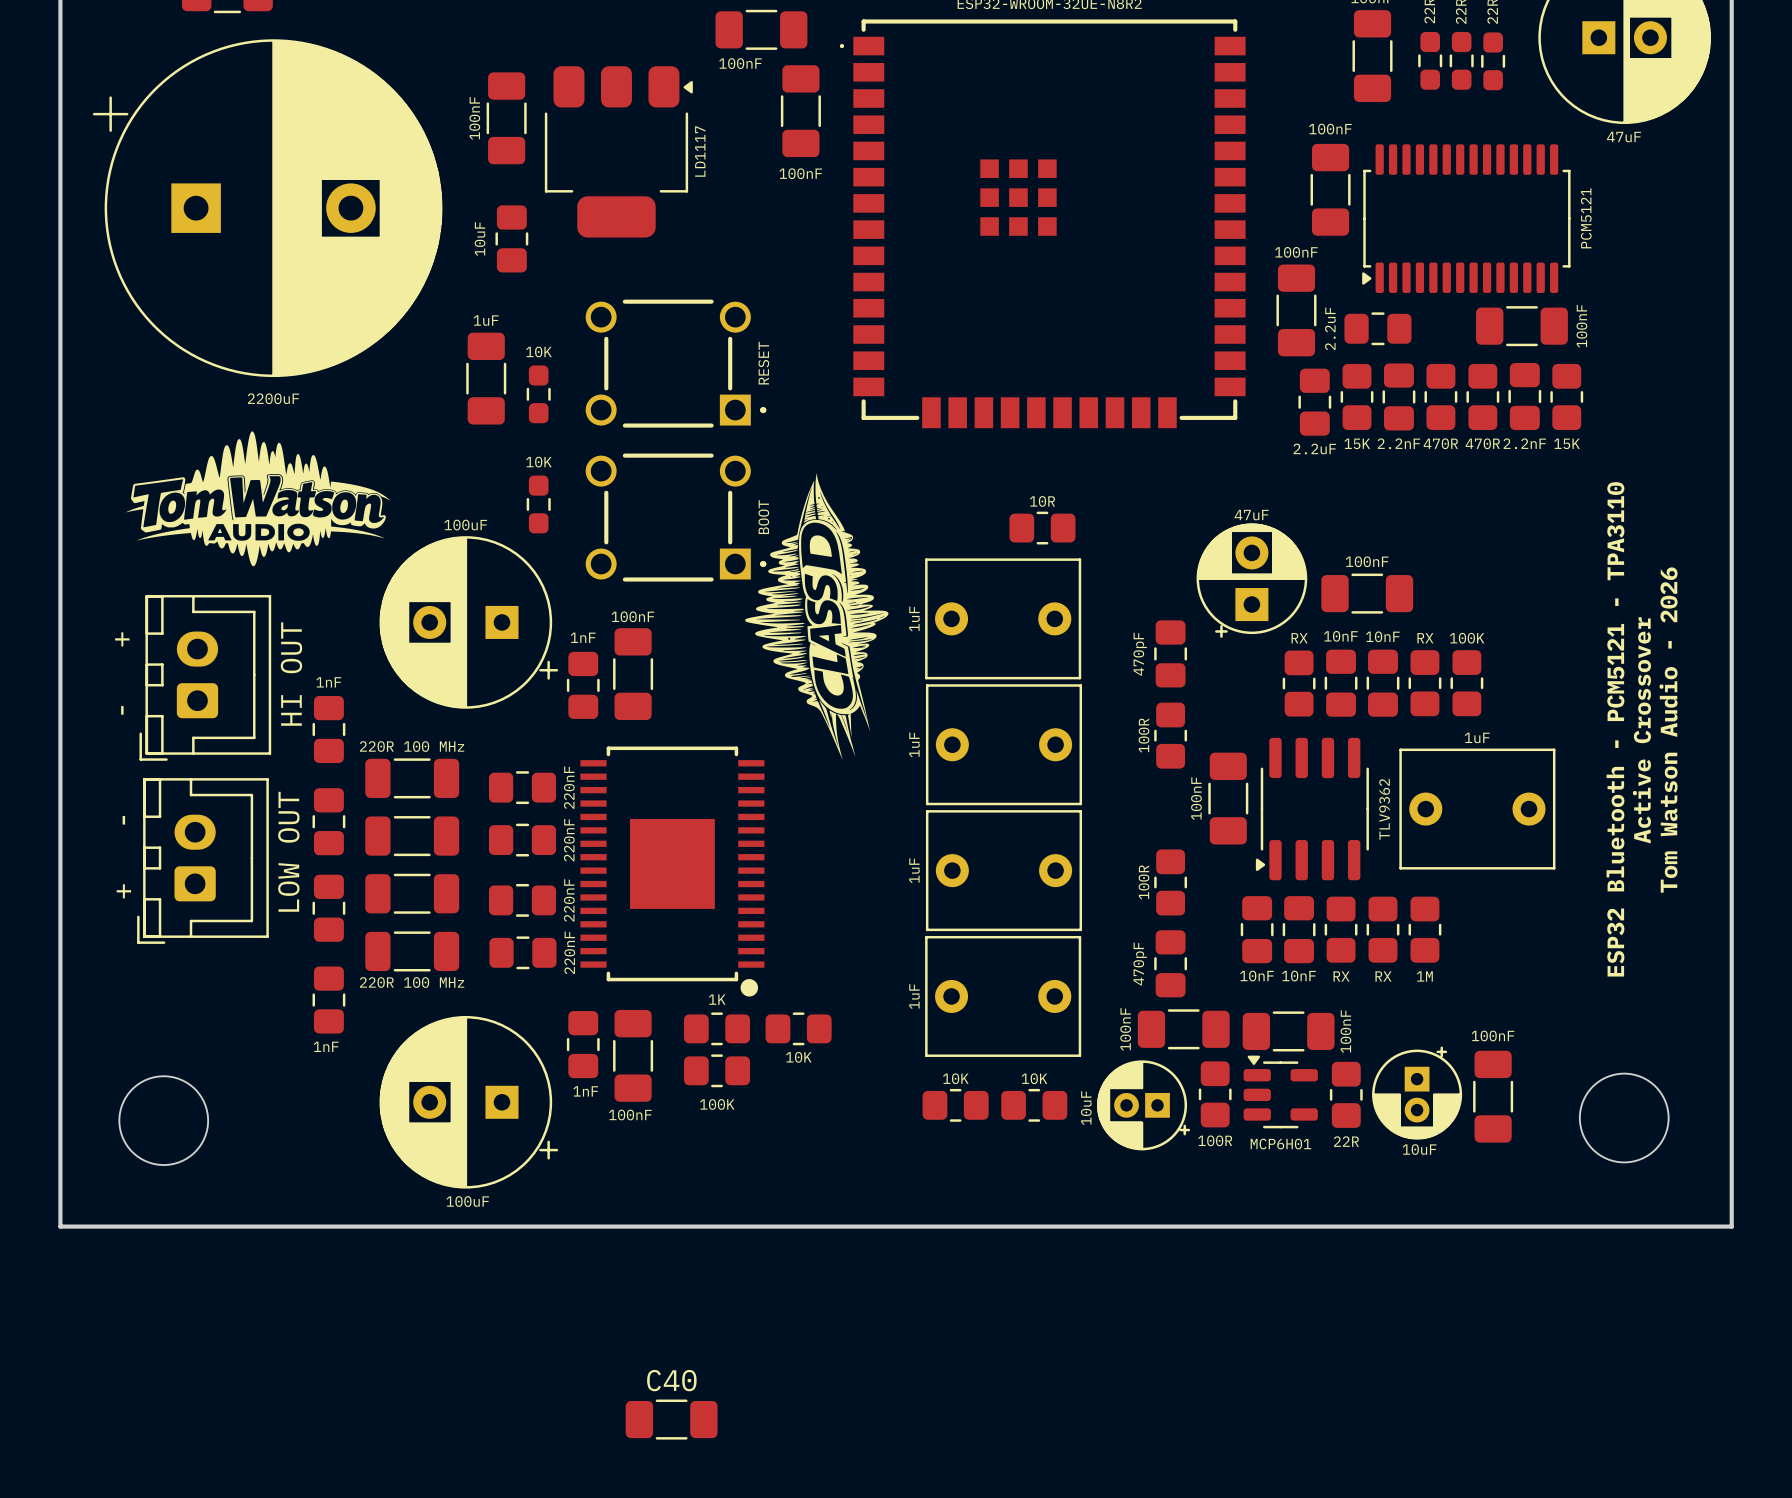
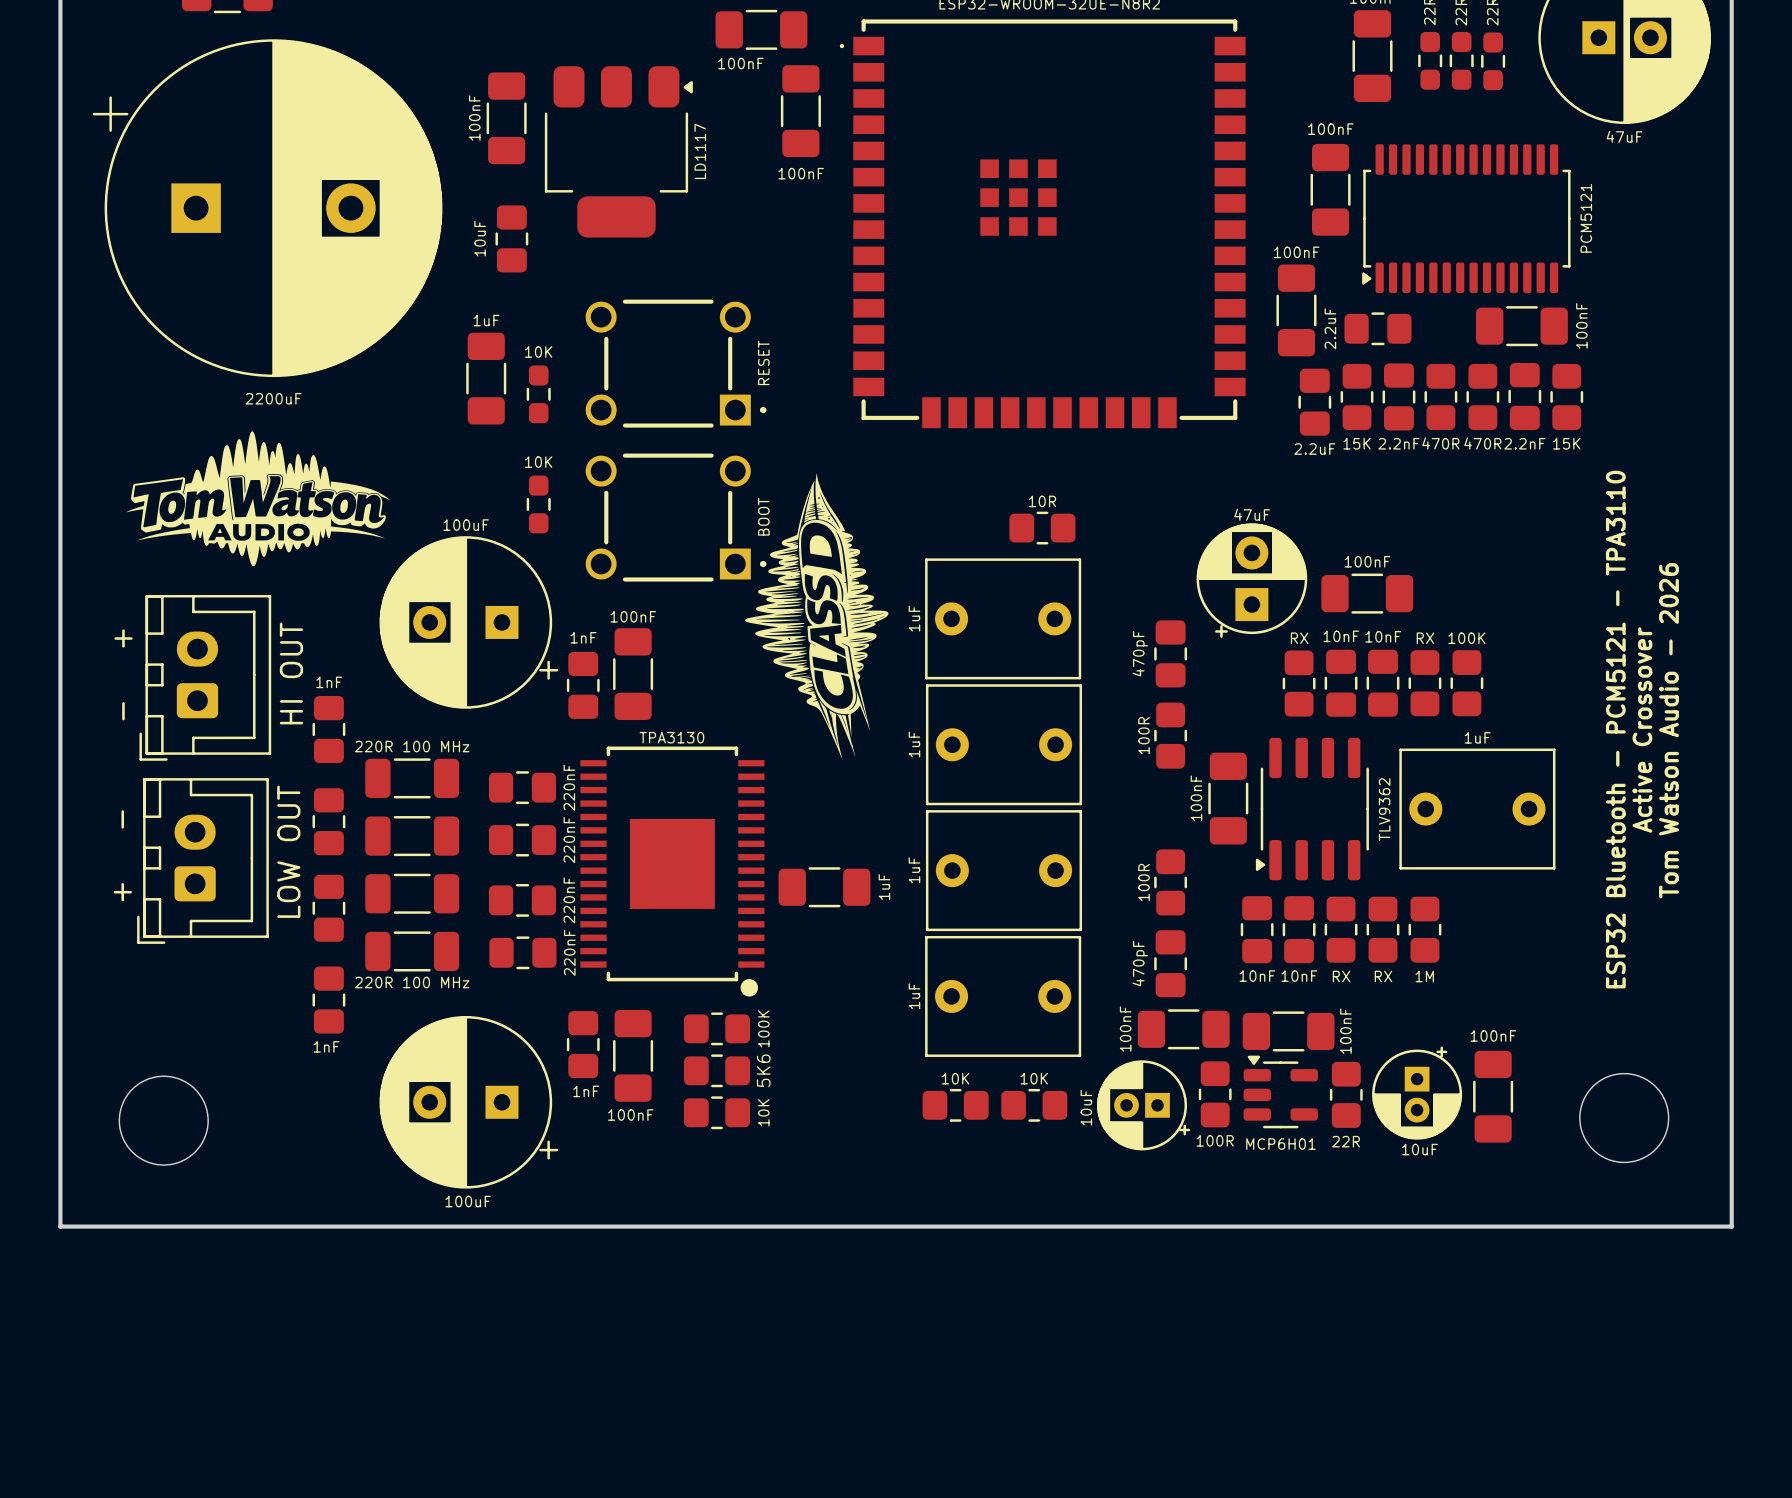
part value: none -> TPA3130 (671, 737)
part: none -> 1uF (824, 887)
part value: 1K (717, 999) -> 100K (763, 1028)
part position: (798, 1028) -> (717, 1112)
part value rotation: 0° (798, 1057) -> 90° counterclockwise (763, 1112)
part value position: 10K (798, 1057) -> 10K (763, 1112)
part value: 100K (717, 1104) -> 5K6 (763, 1070)
C40: (671, 1419) -> none

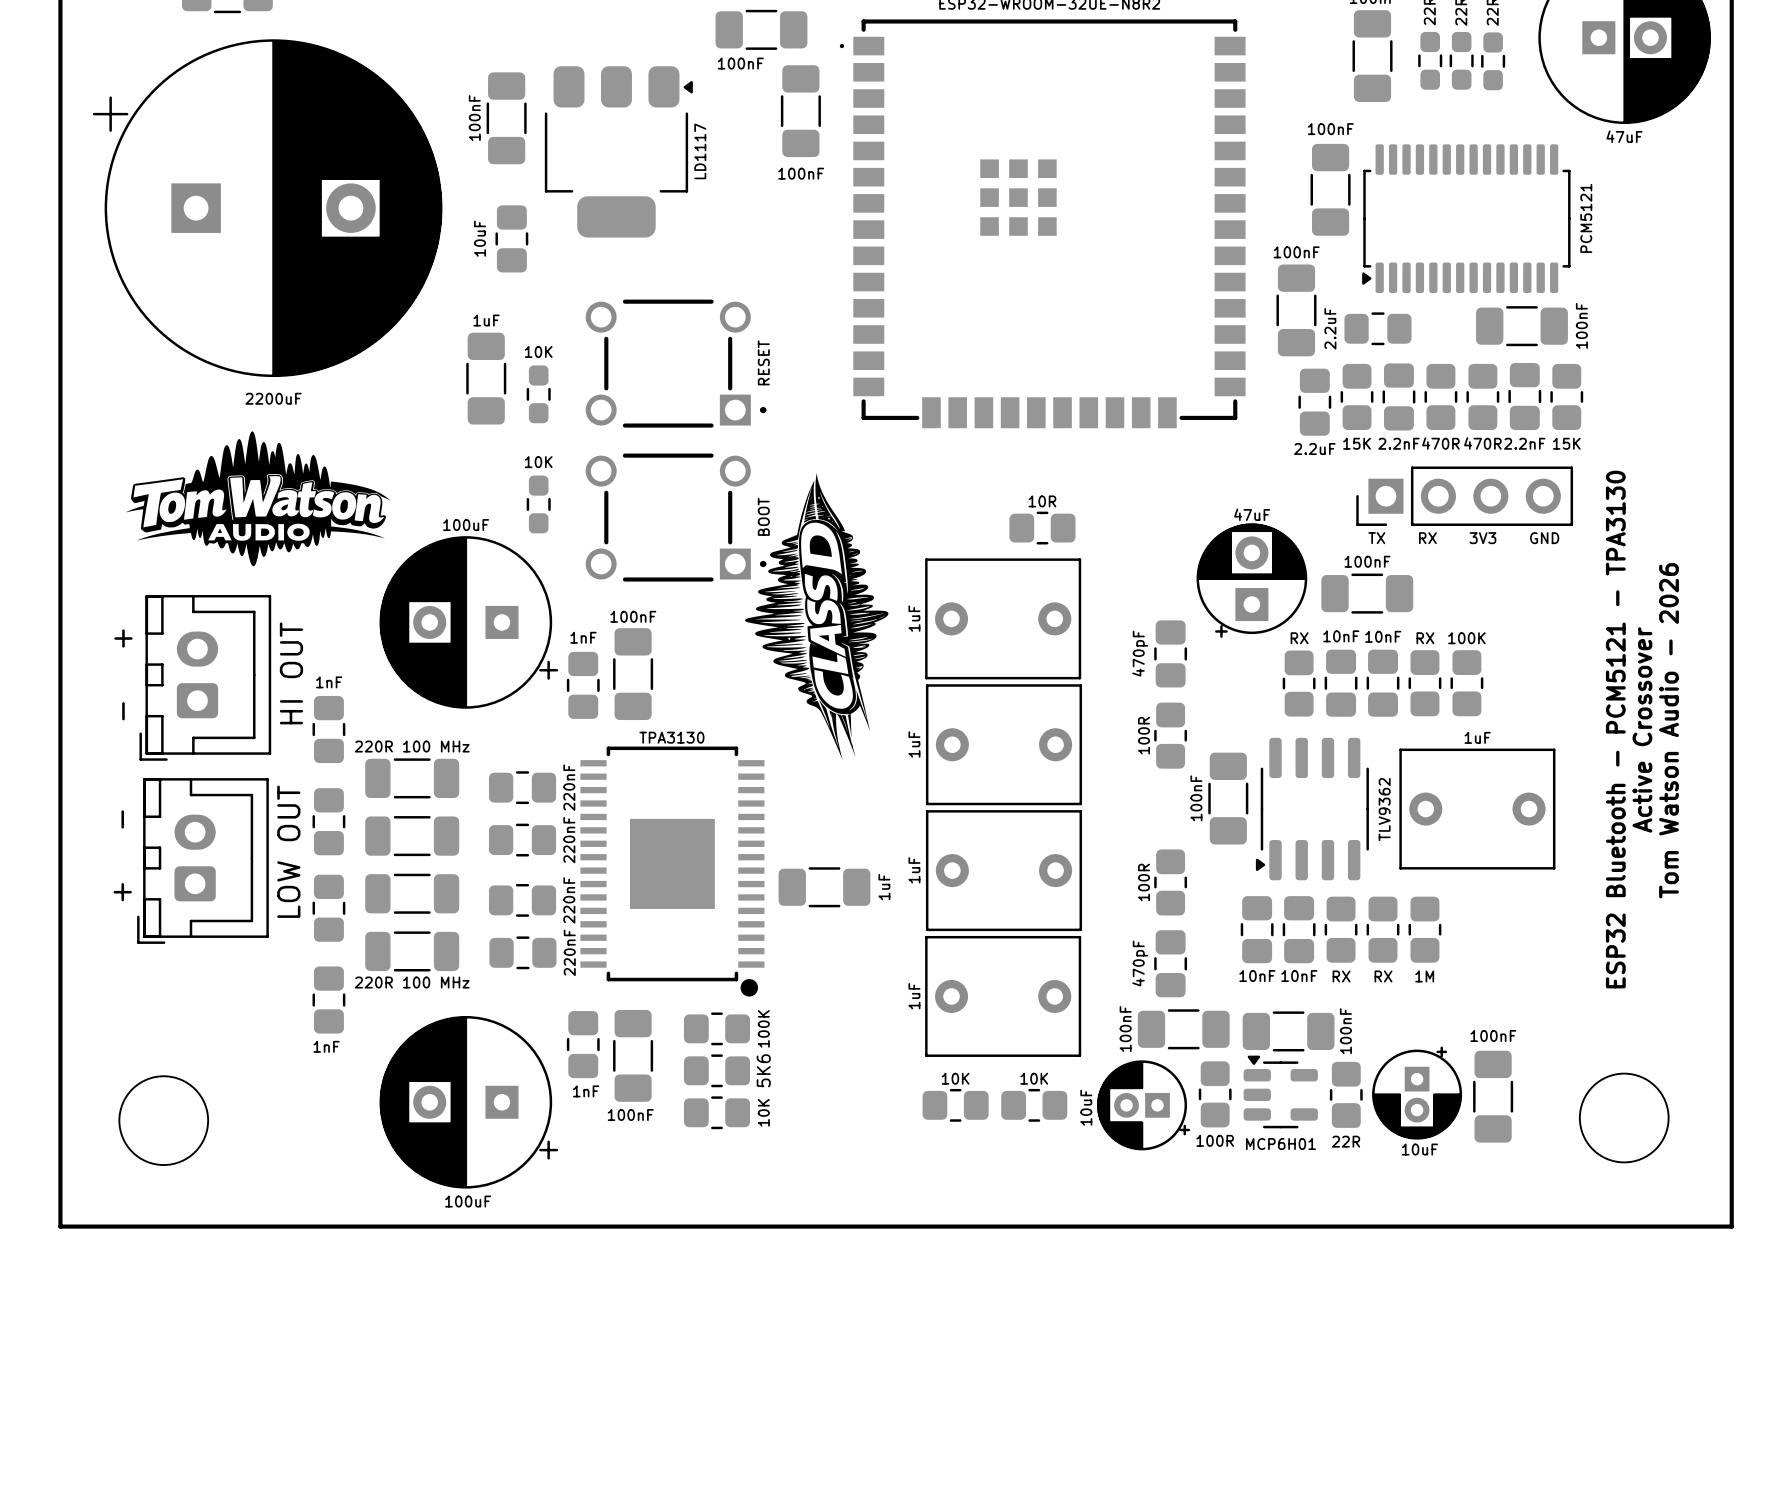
part: none -> (1464, 496)
text: none -> TX RX 3V3 GND (1463, 538)
text: ESP32 Bluetooth - PCM5121 - TPA3110 (1615, 729) -> ESP32 Bluetooth - PCM5121 - TPA3130 (1615, 729)

